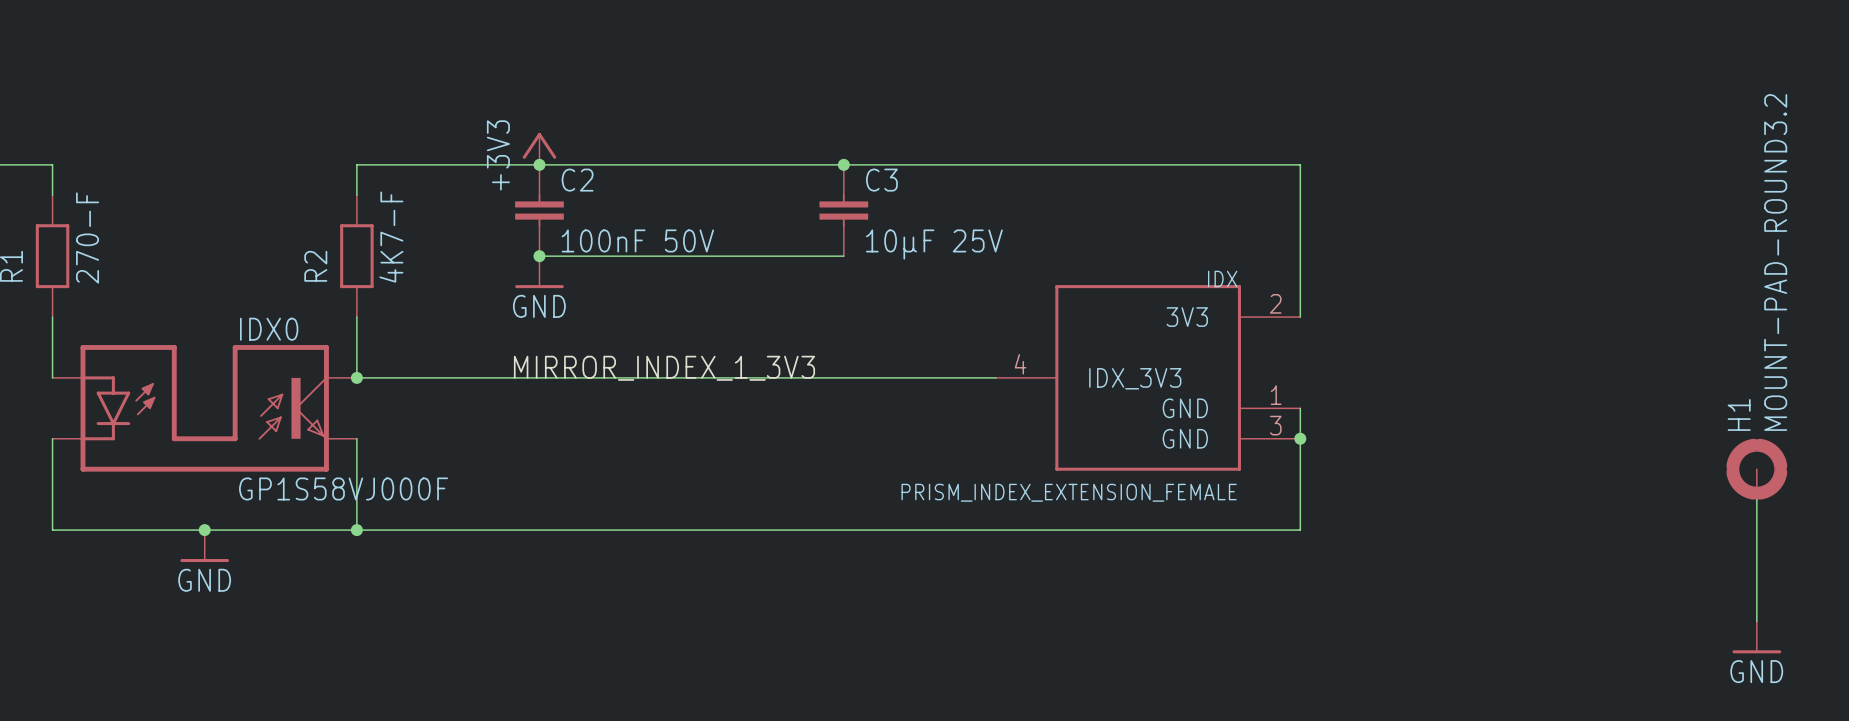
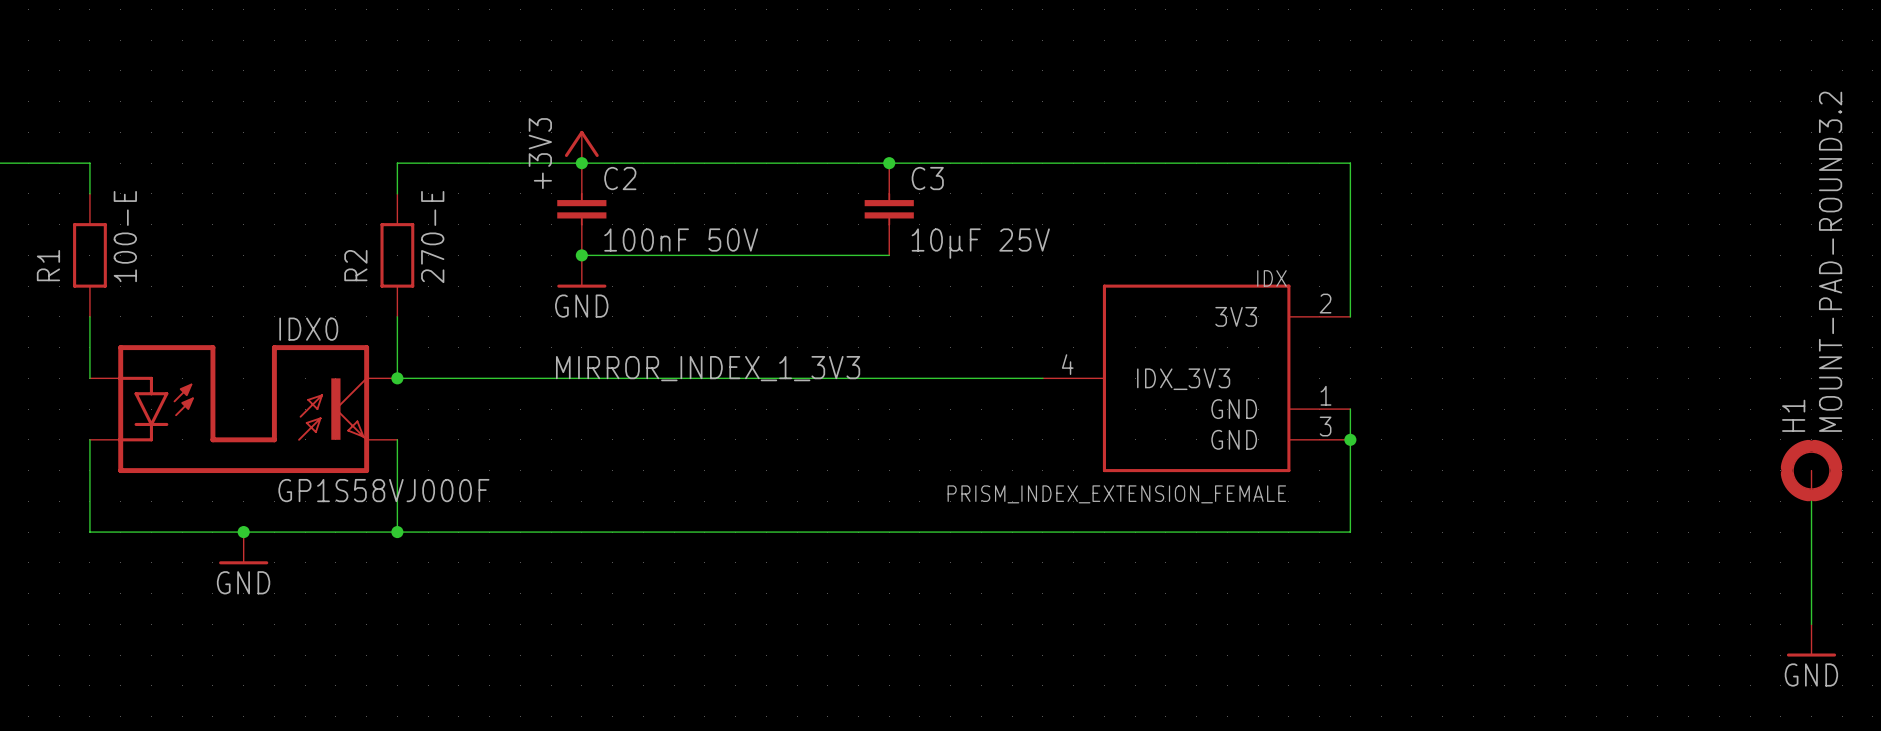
R2 value: 4K7-F (391, 237) -> 270-E (432, 237)
R1 value: 270-F (87, 238) -> 100-E (125, 236)

